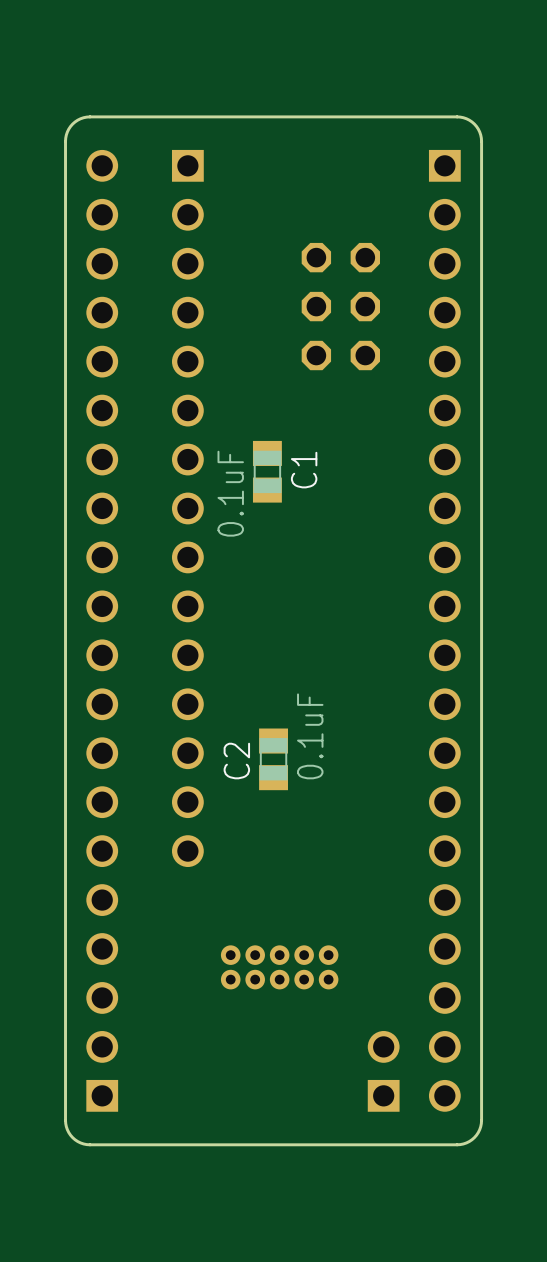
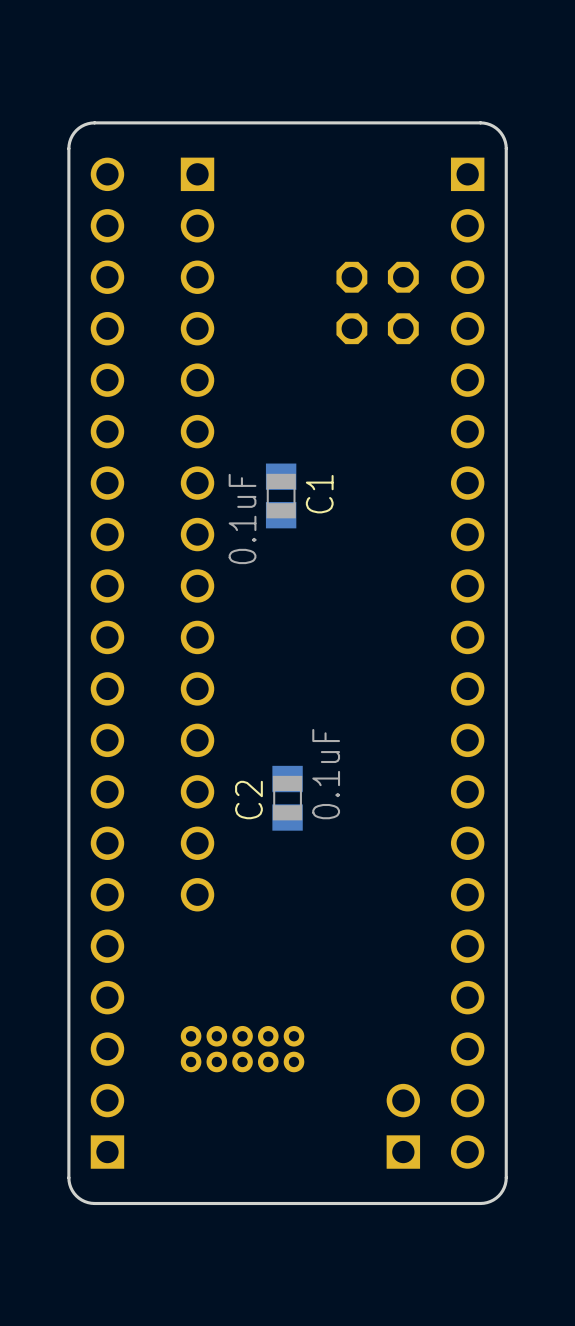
part: none -> (377, 302)
part: (340, 306) -> none
part position: (279, 967) -> (242, 1049)

